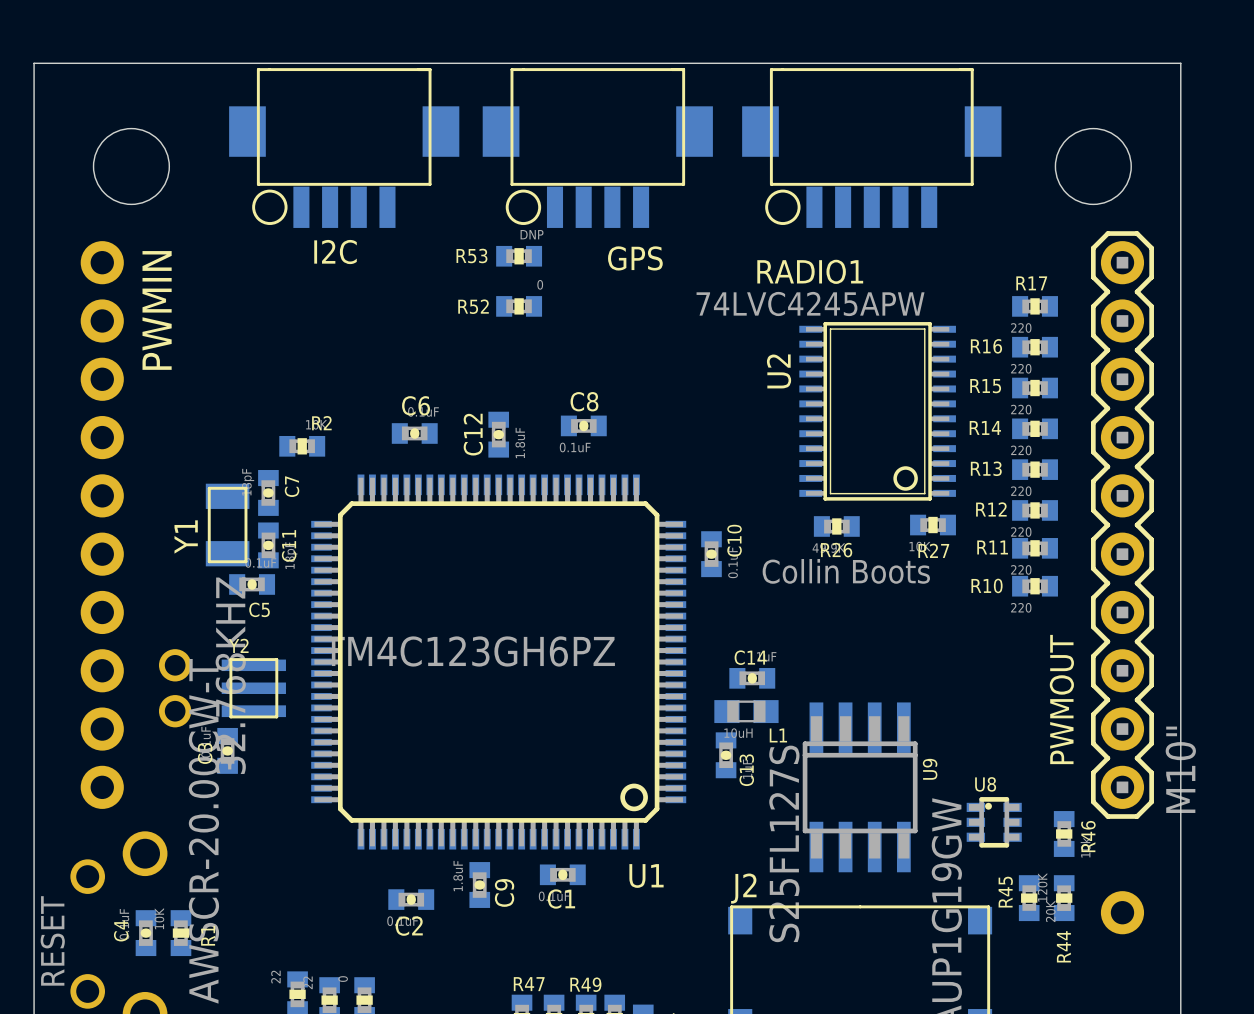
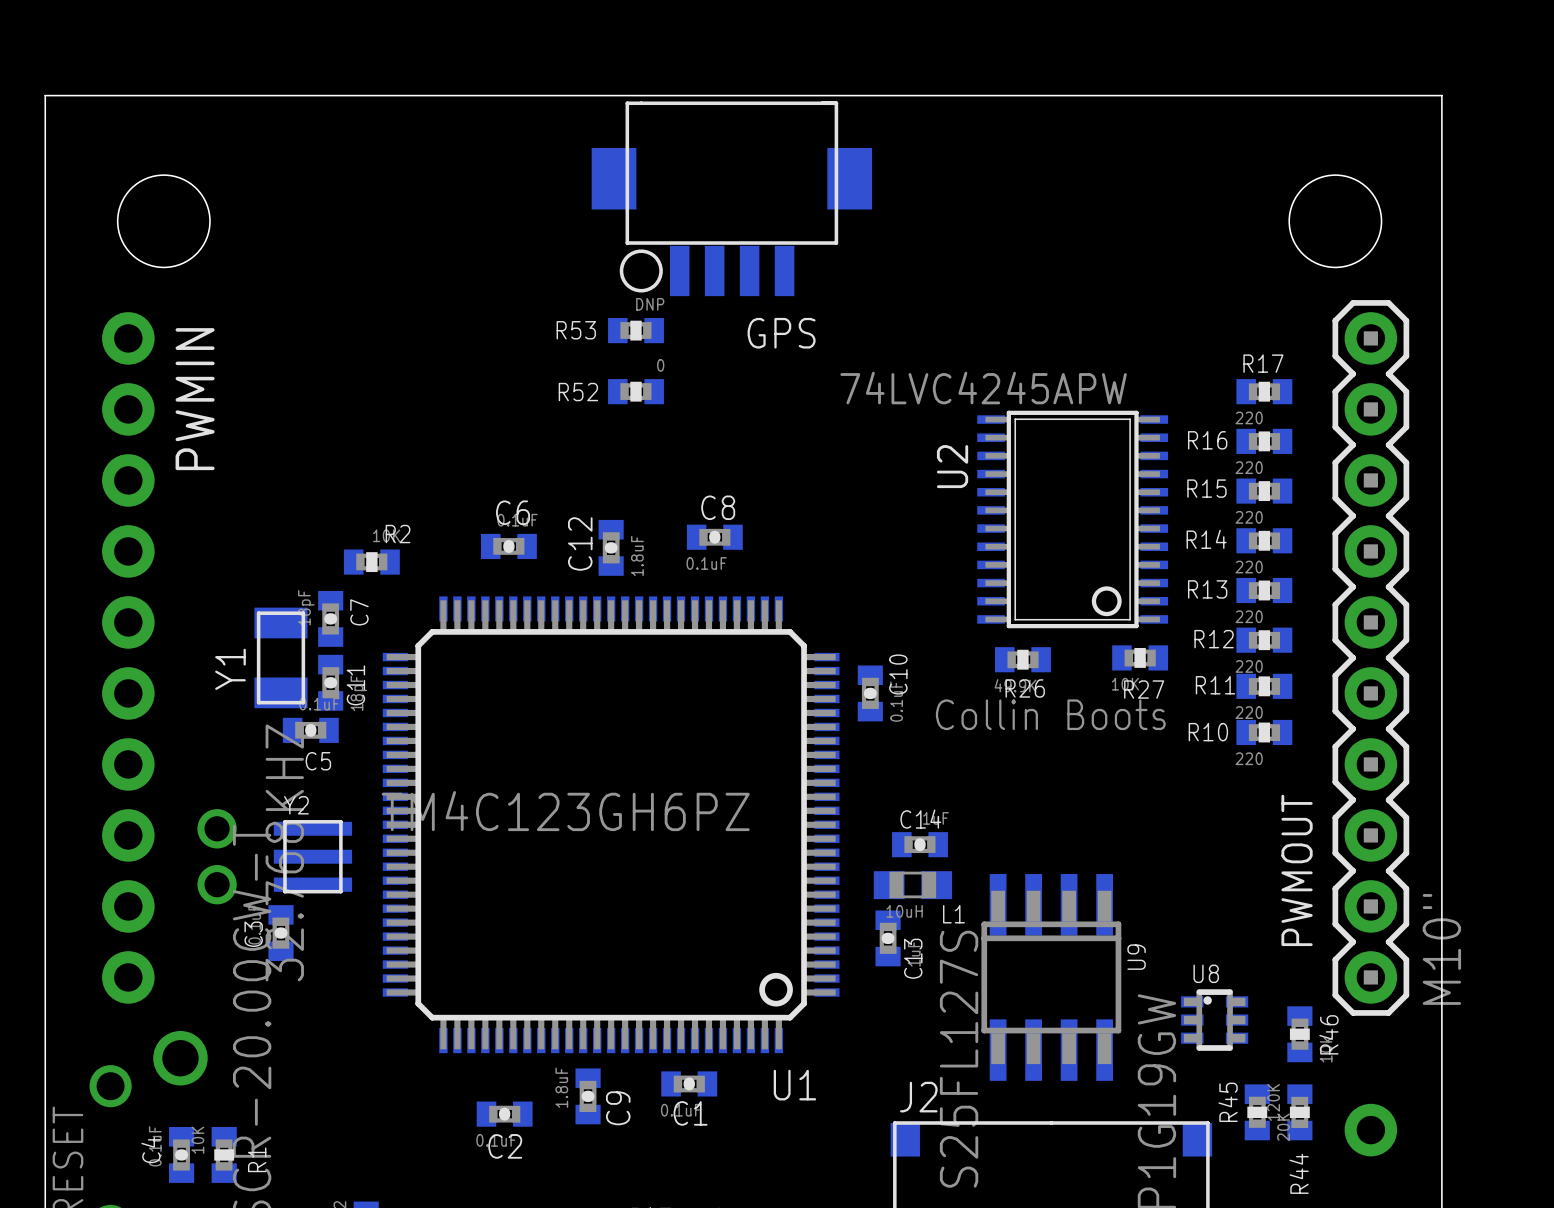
I2C: (344, 148) -> none
RADIO1: (871, 148) -> none

